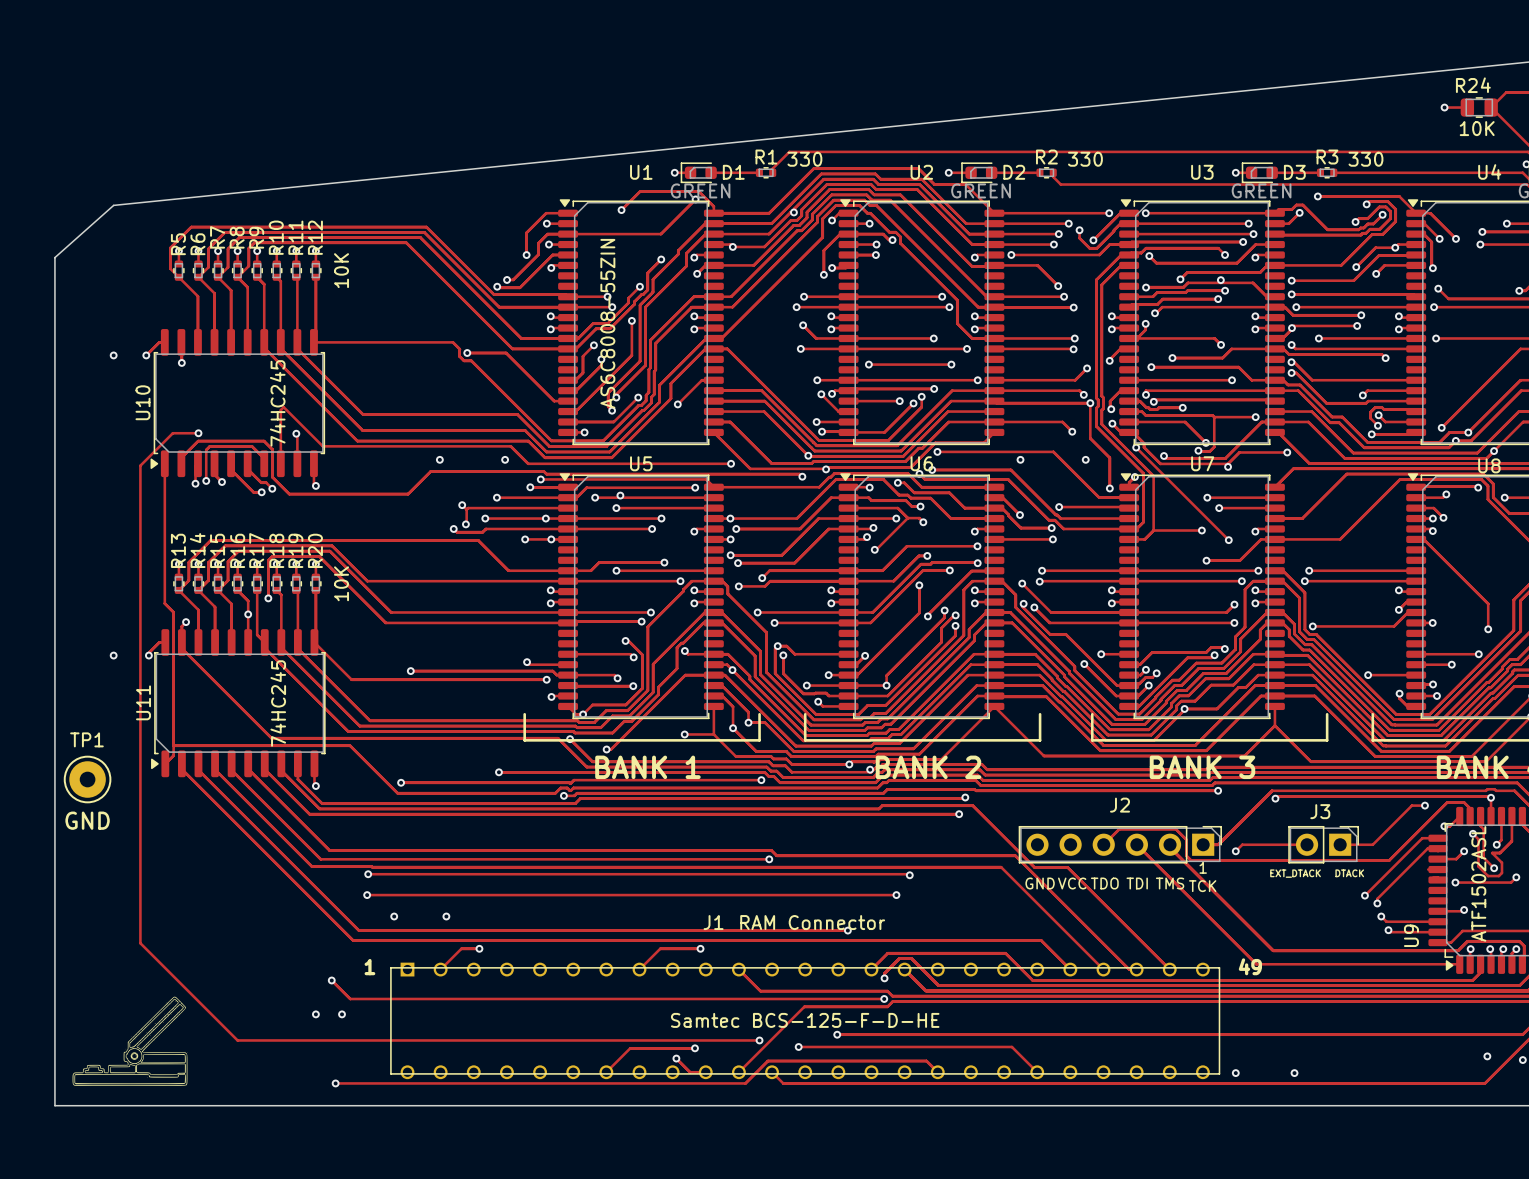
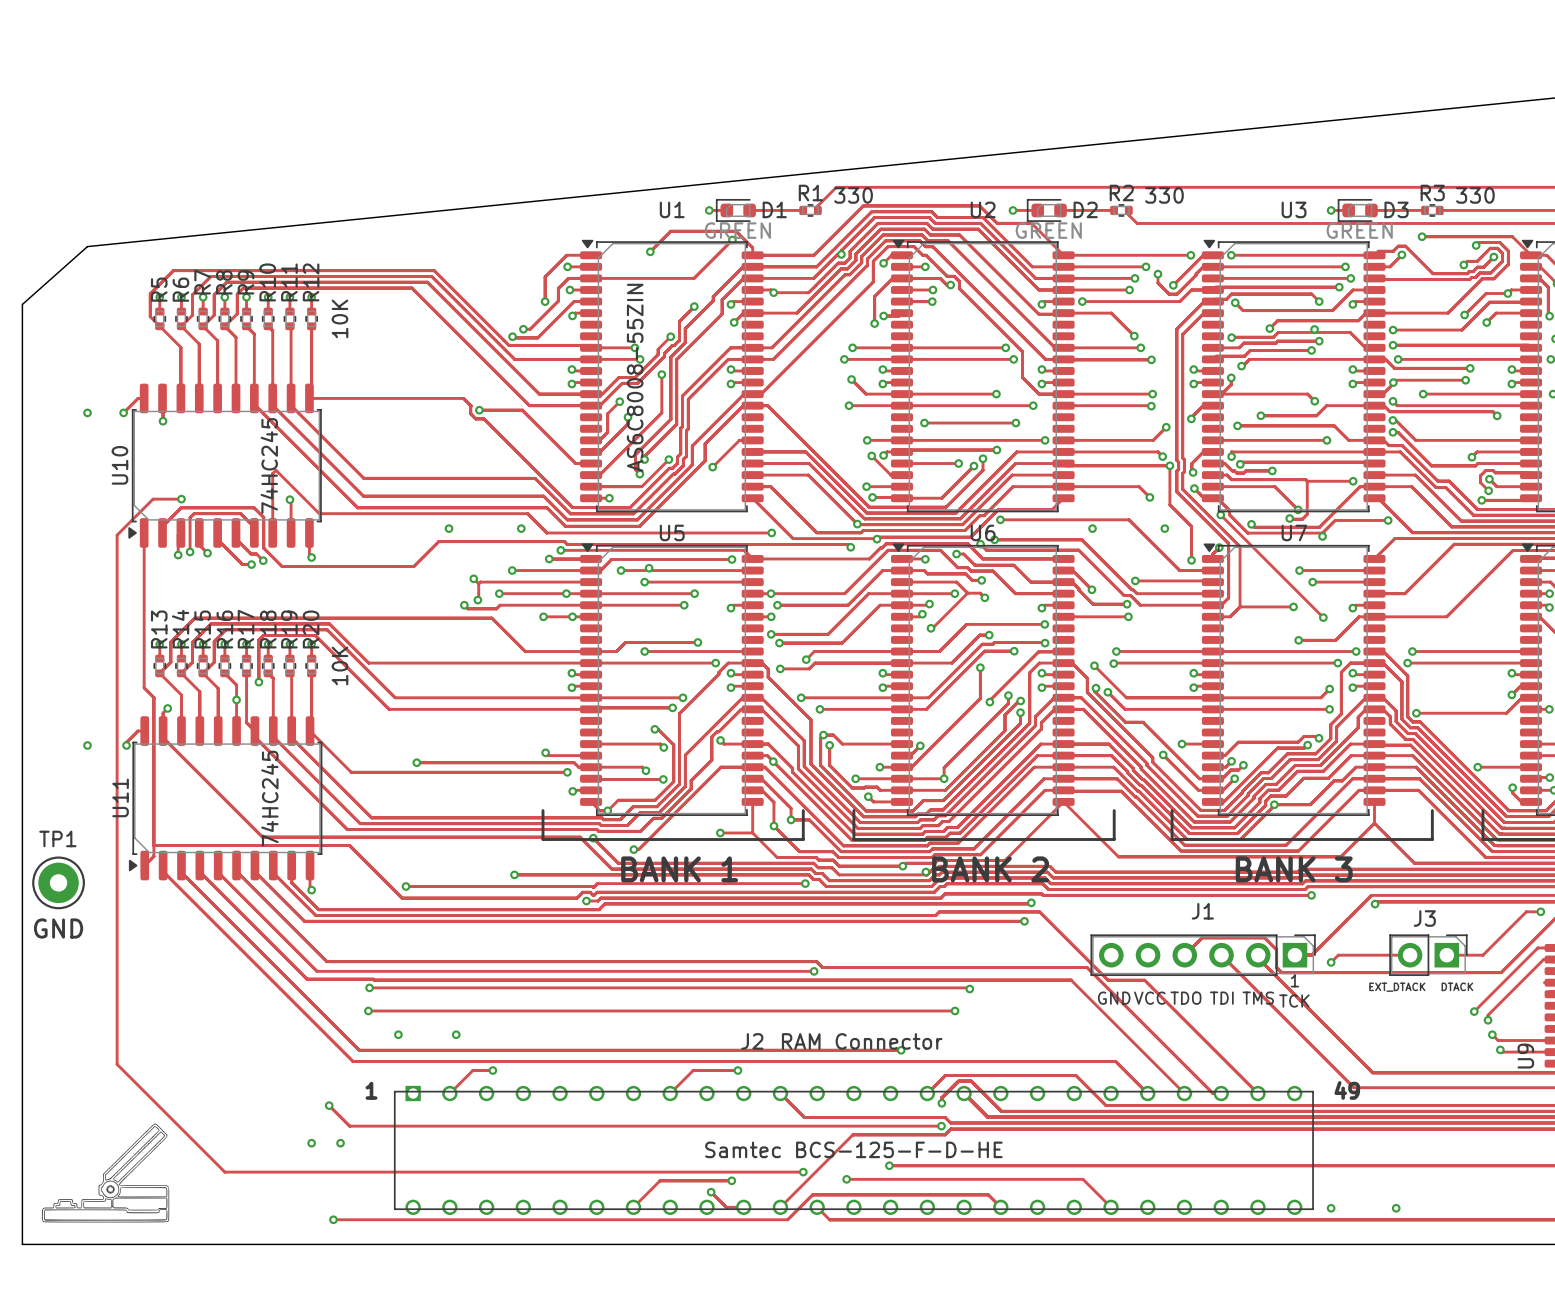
J2 name: J2 (1120, 805) -> J1 (1202, 911)
J1 name: J1 (713, 922) -> J2 (752, 1041)

